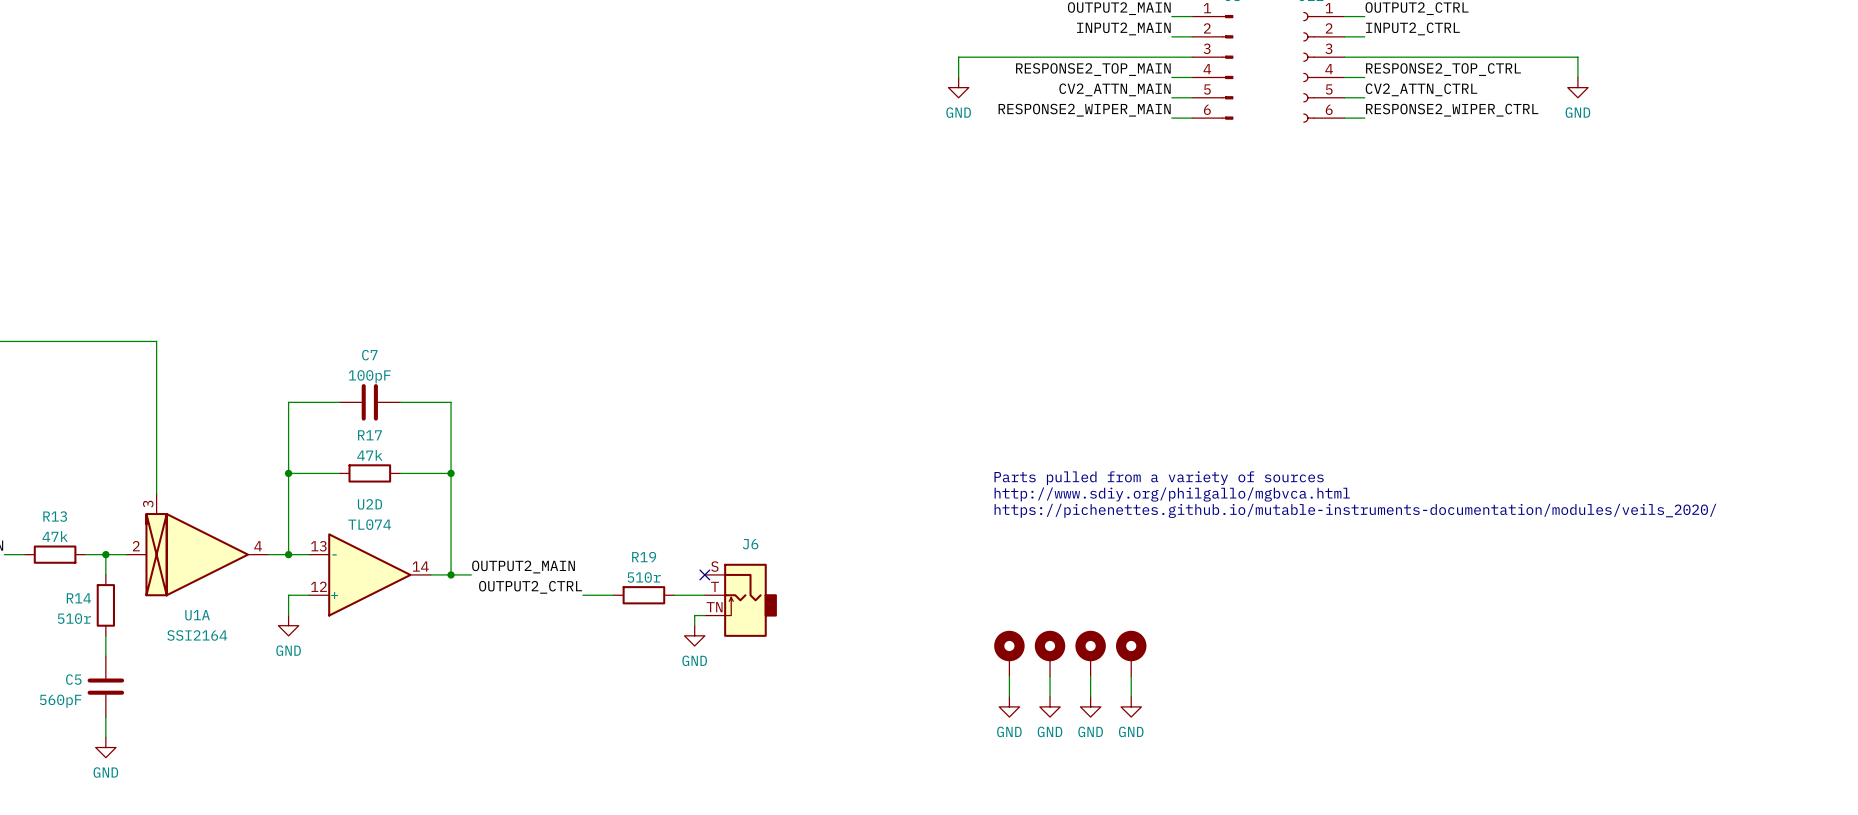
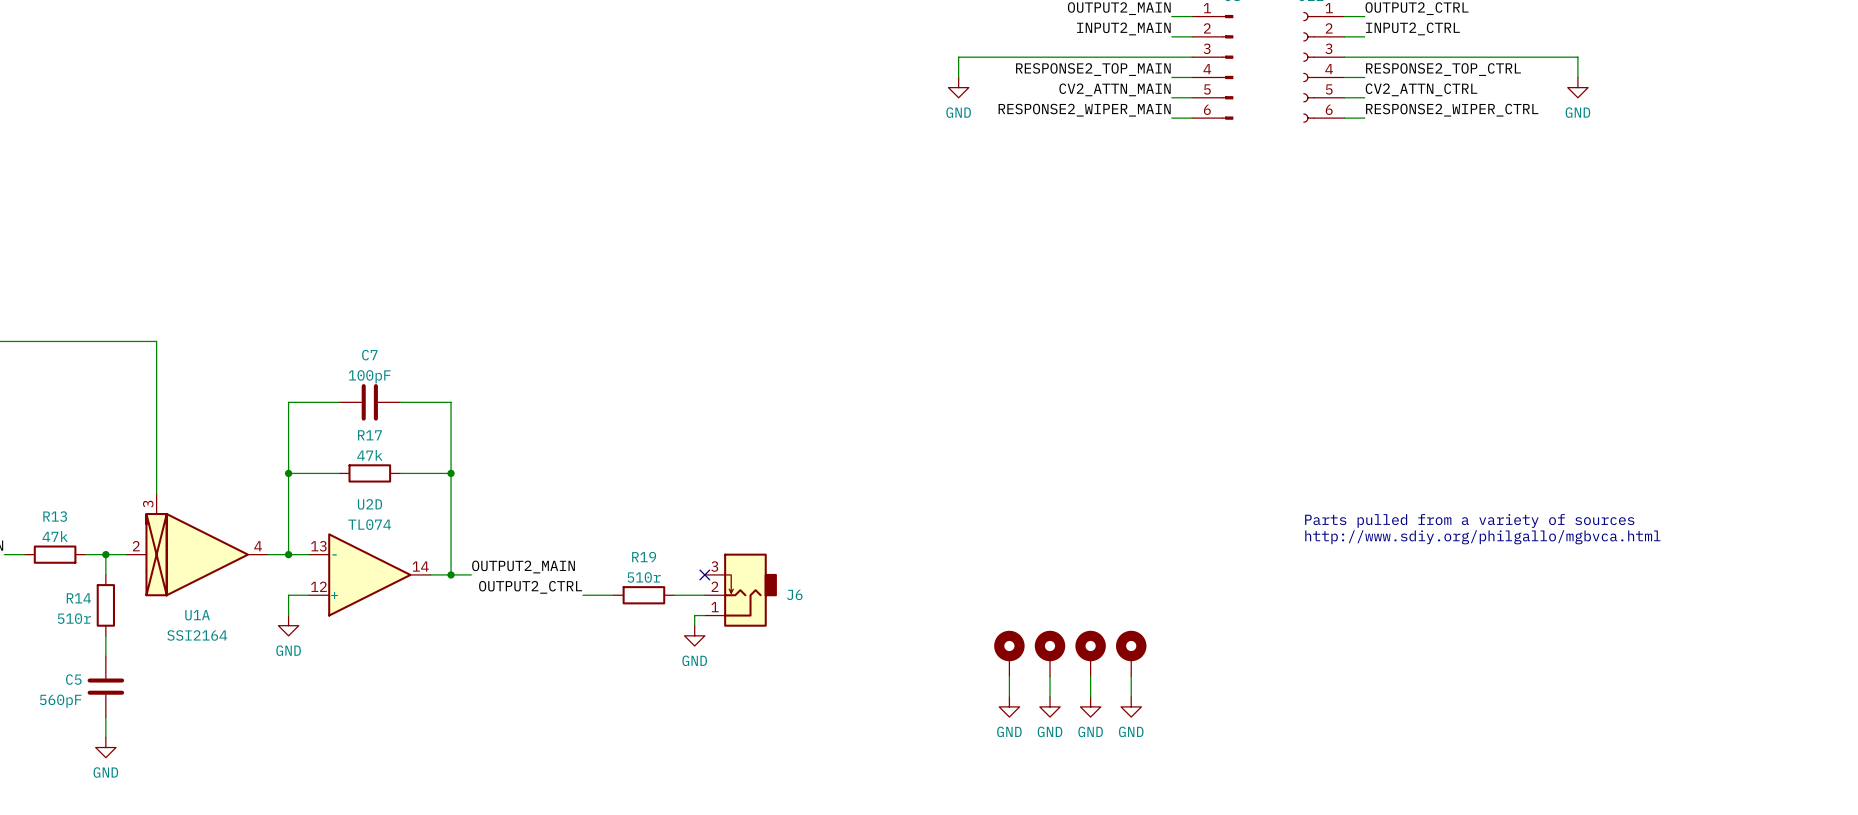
text: Parts pulled from a variety of sources (1159, 478) -> none
text: http://www.sdiy.org/philgallo/mgbvca.html (1172, 494) -> none
text: https://pichenettes.github.io/mutable-instruments-documentation/modules/veils_2020/ (1355, 510) -> none
text: none -> Parts pulled from a variety of sources (1469, 520)
text: none -> http://www.sdiy.org/philgallo/mgbvca.html (1482, 537)
J6 name position: J6 (750, 544) -> J6 (794, 594)
J6 symbol: [704, 563, 777, 637] -> [704, 553, 777, 627]

